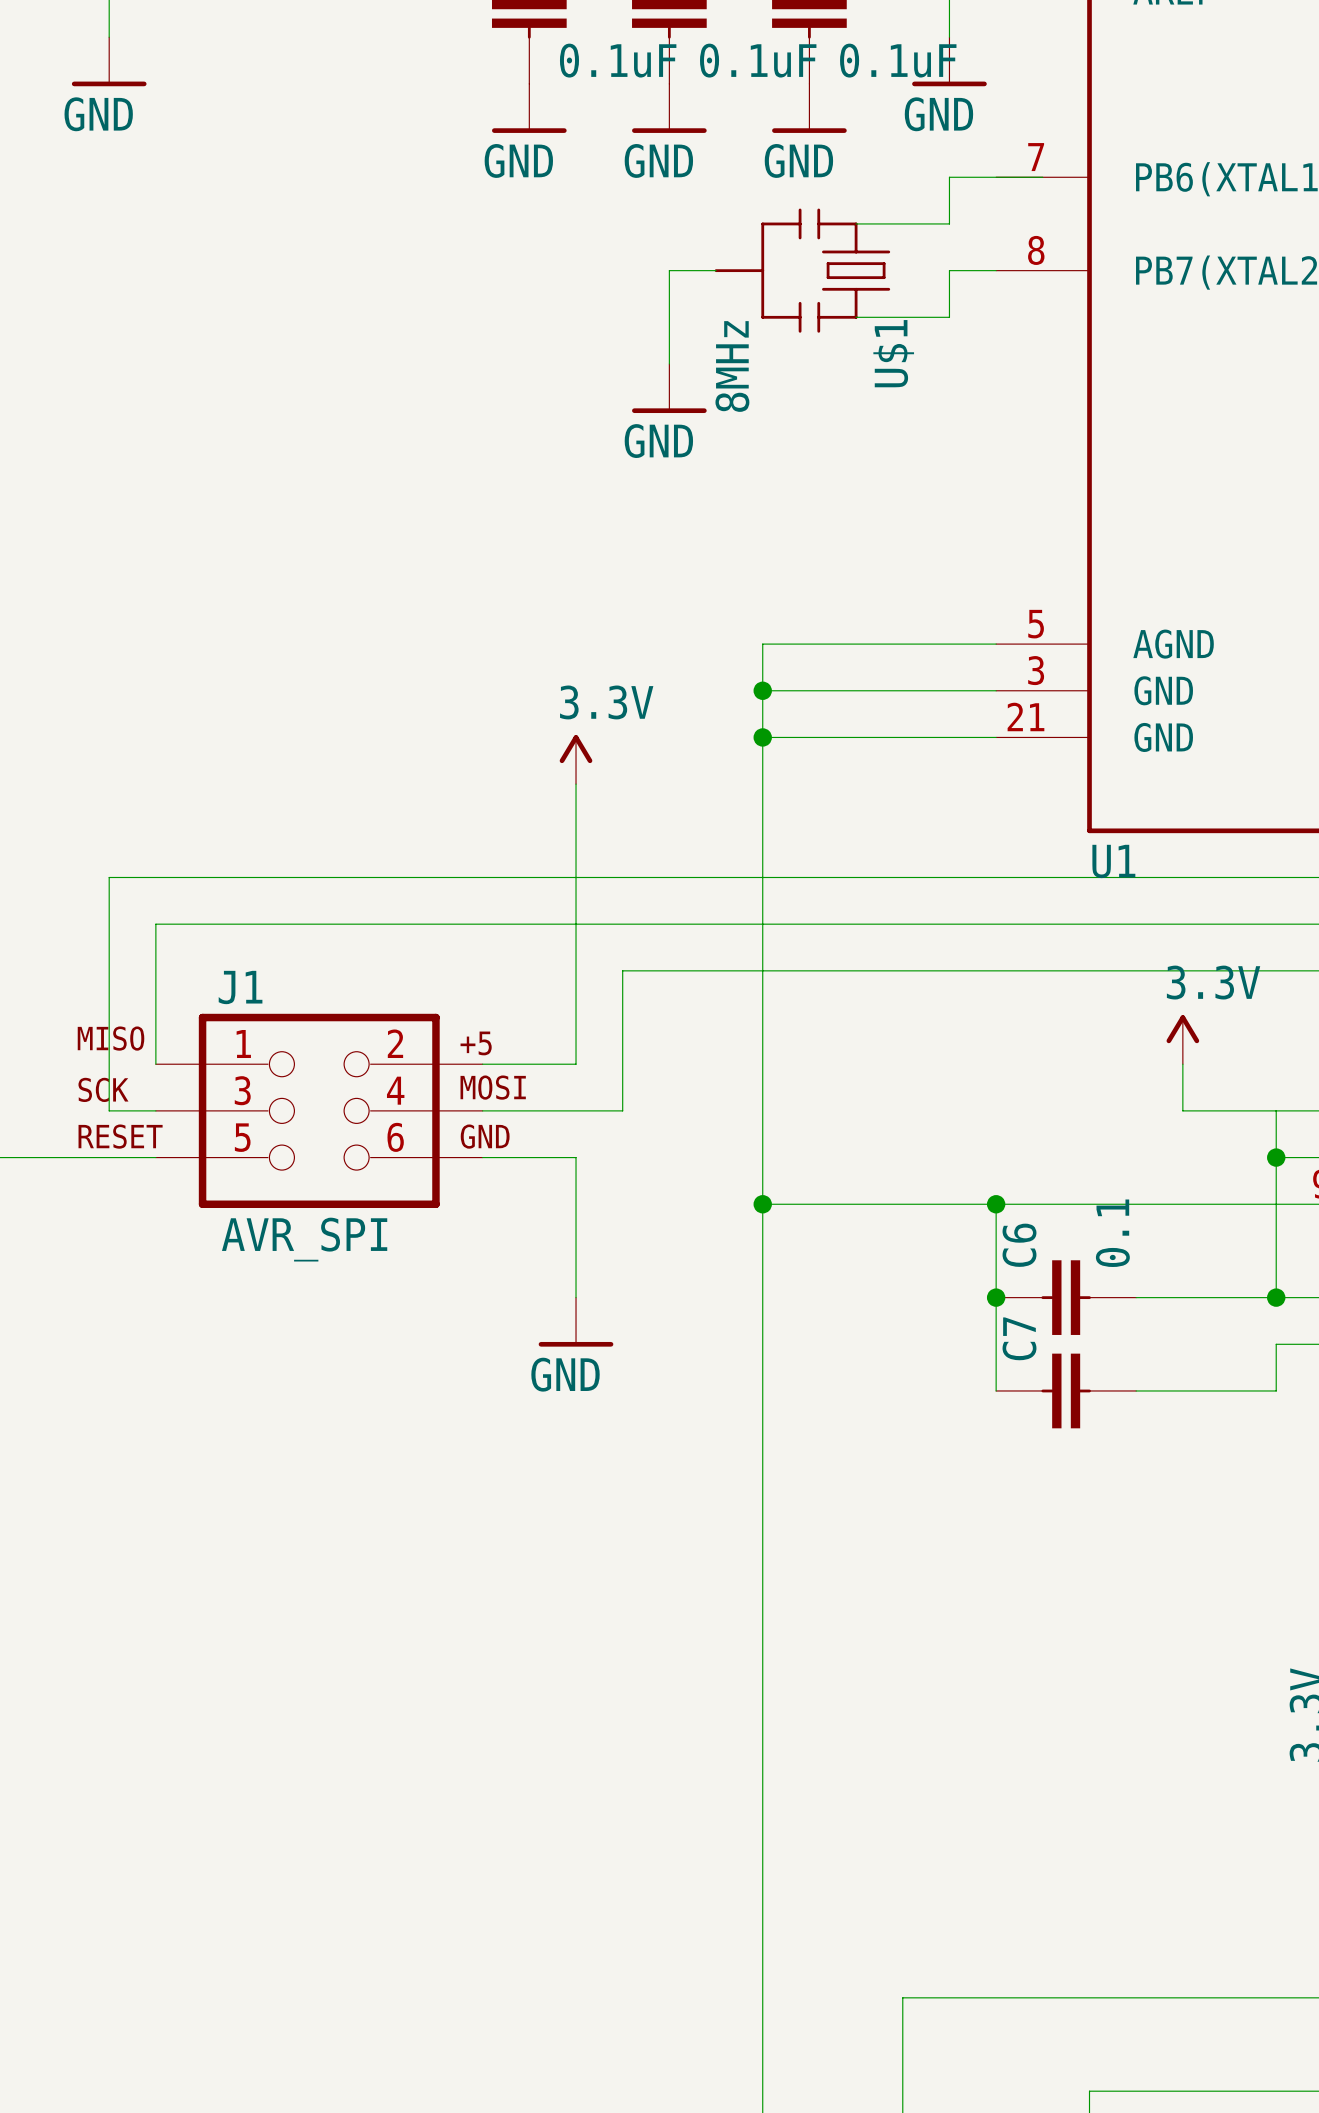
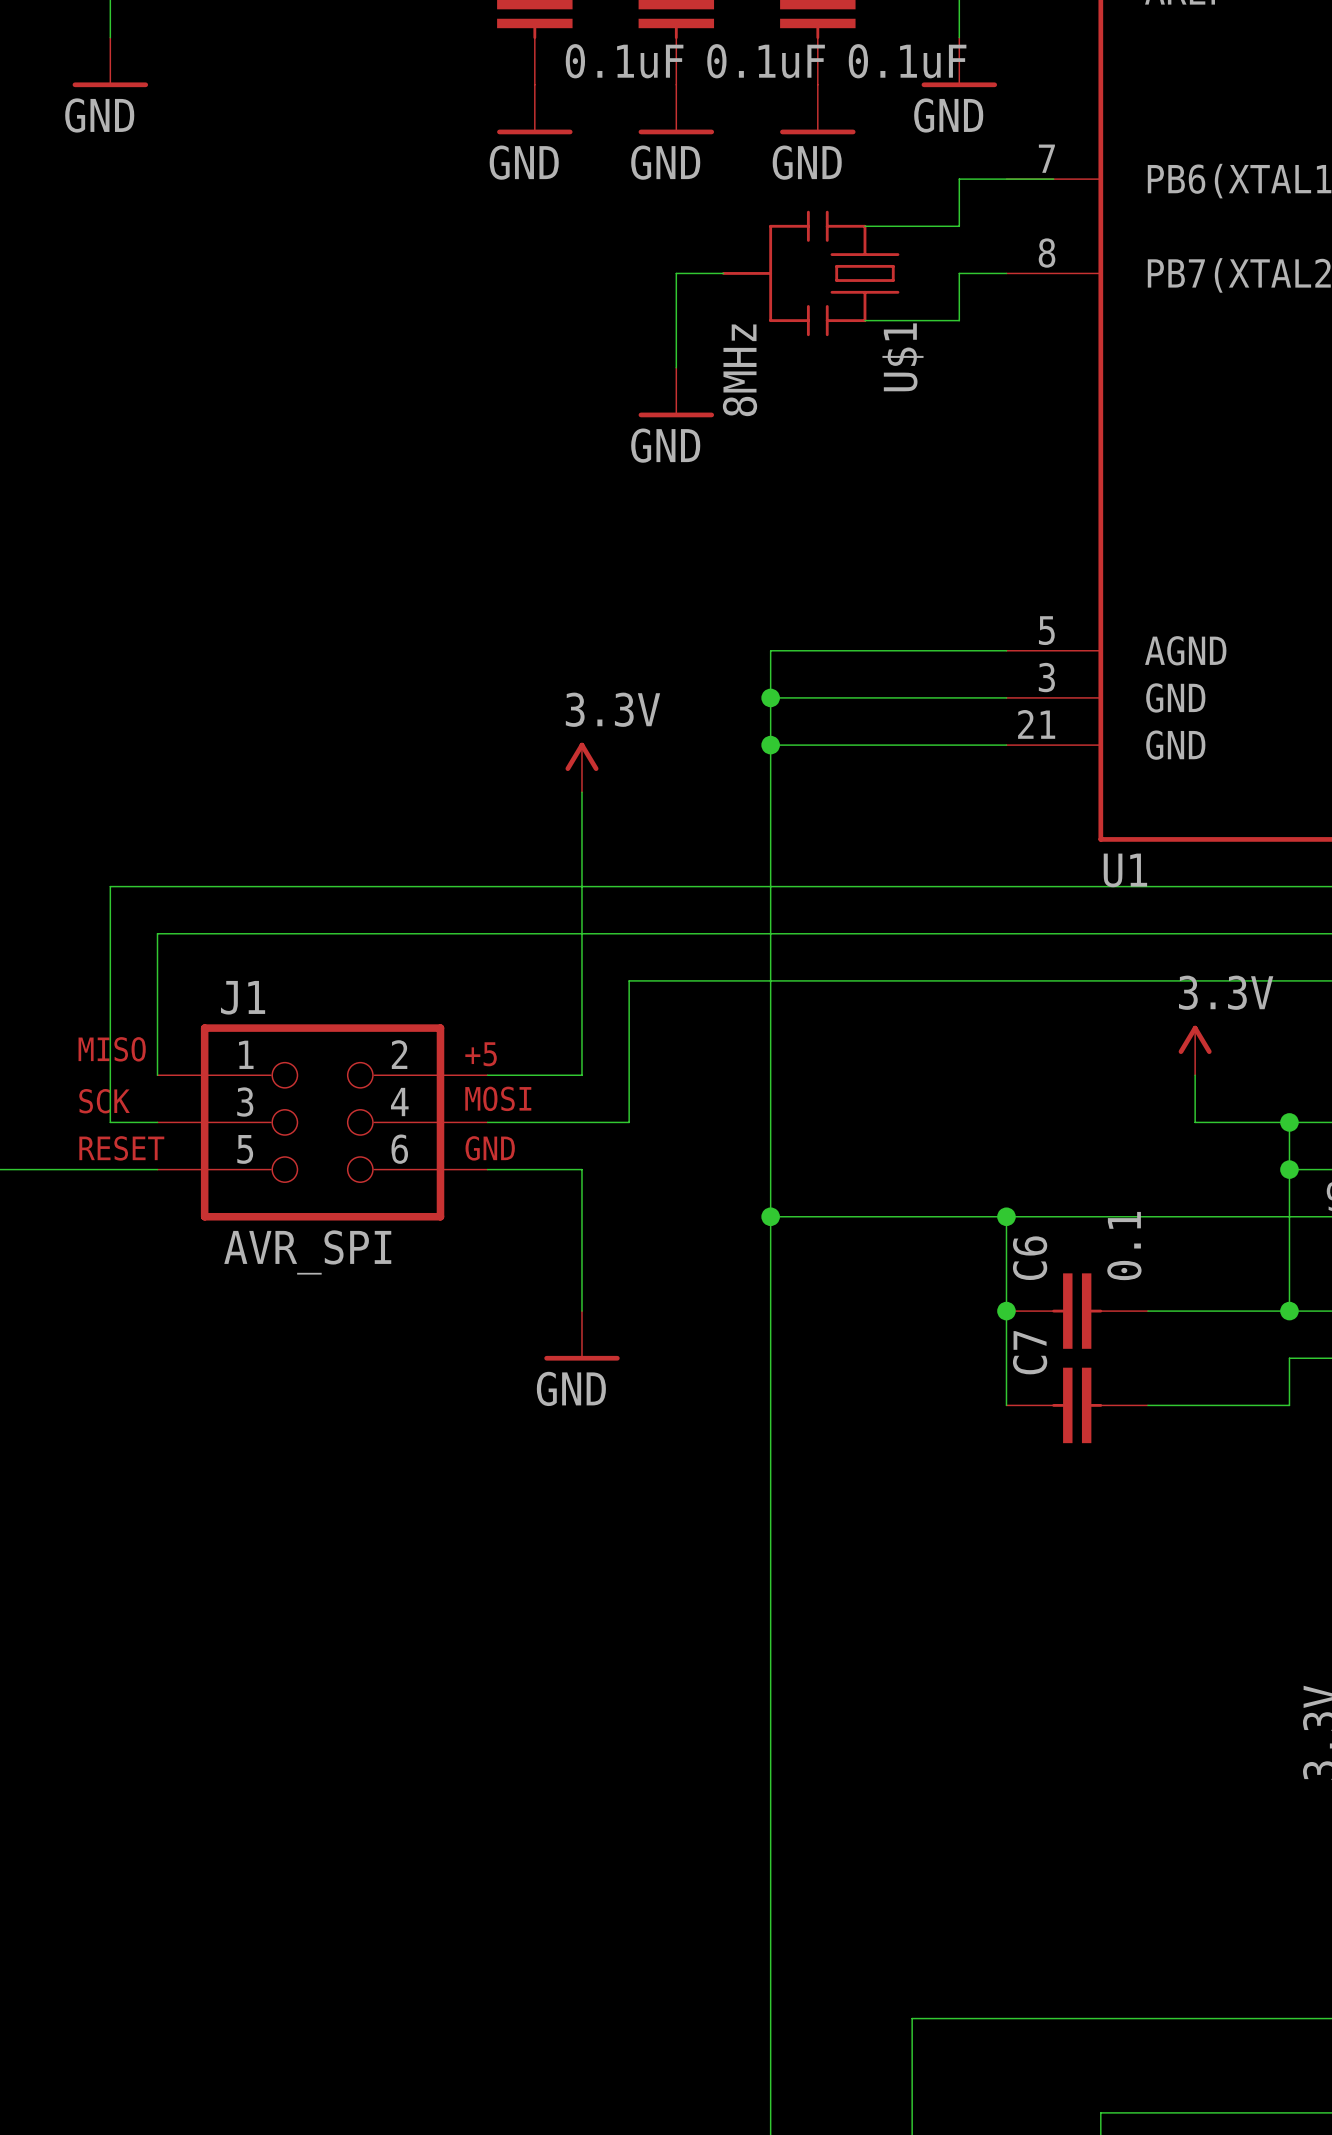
junction: none -> (1289, 1122)

